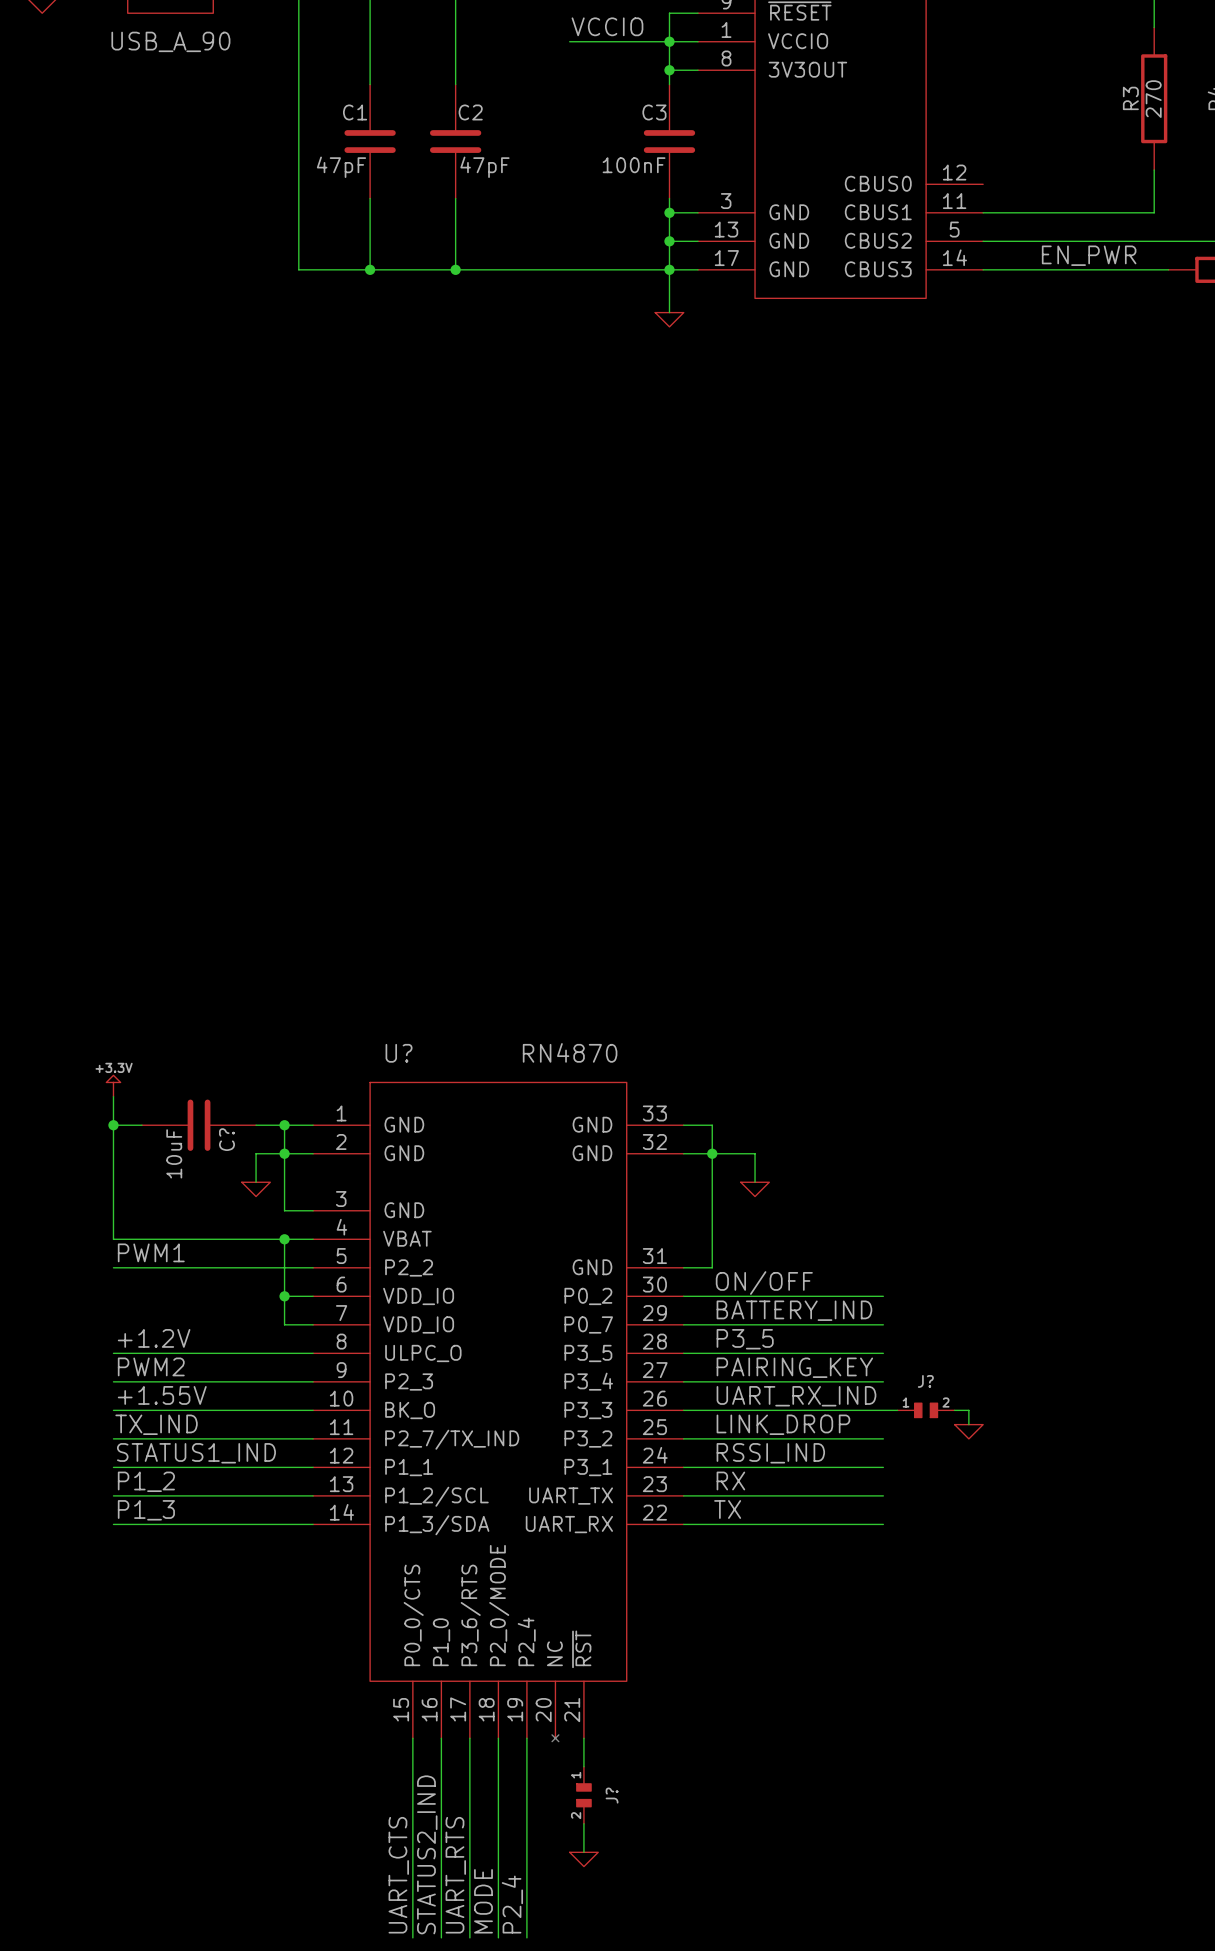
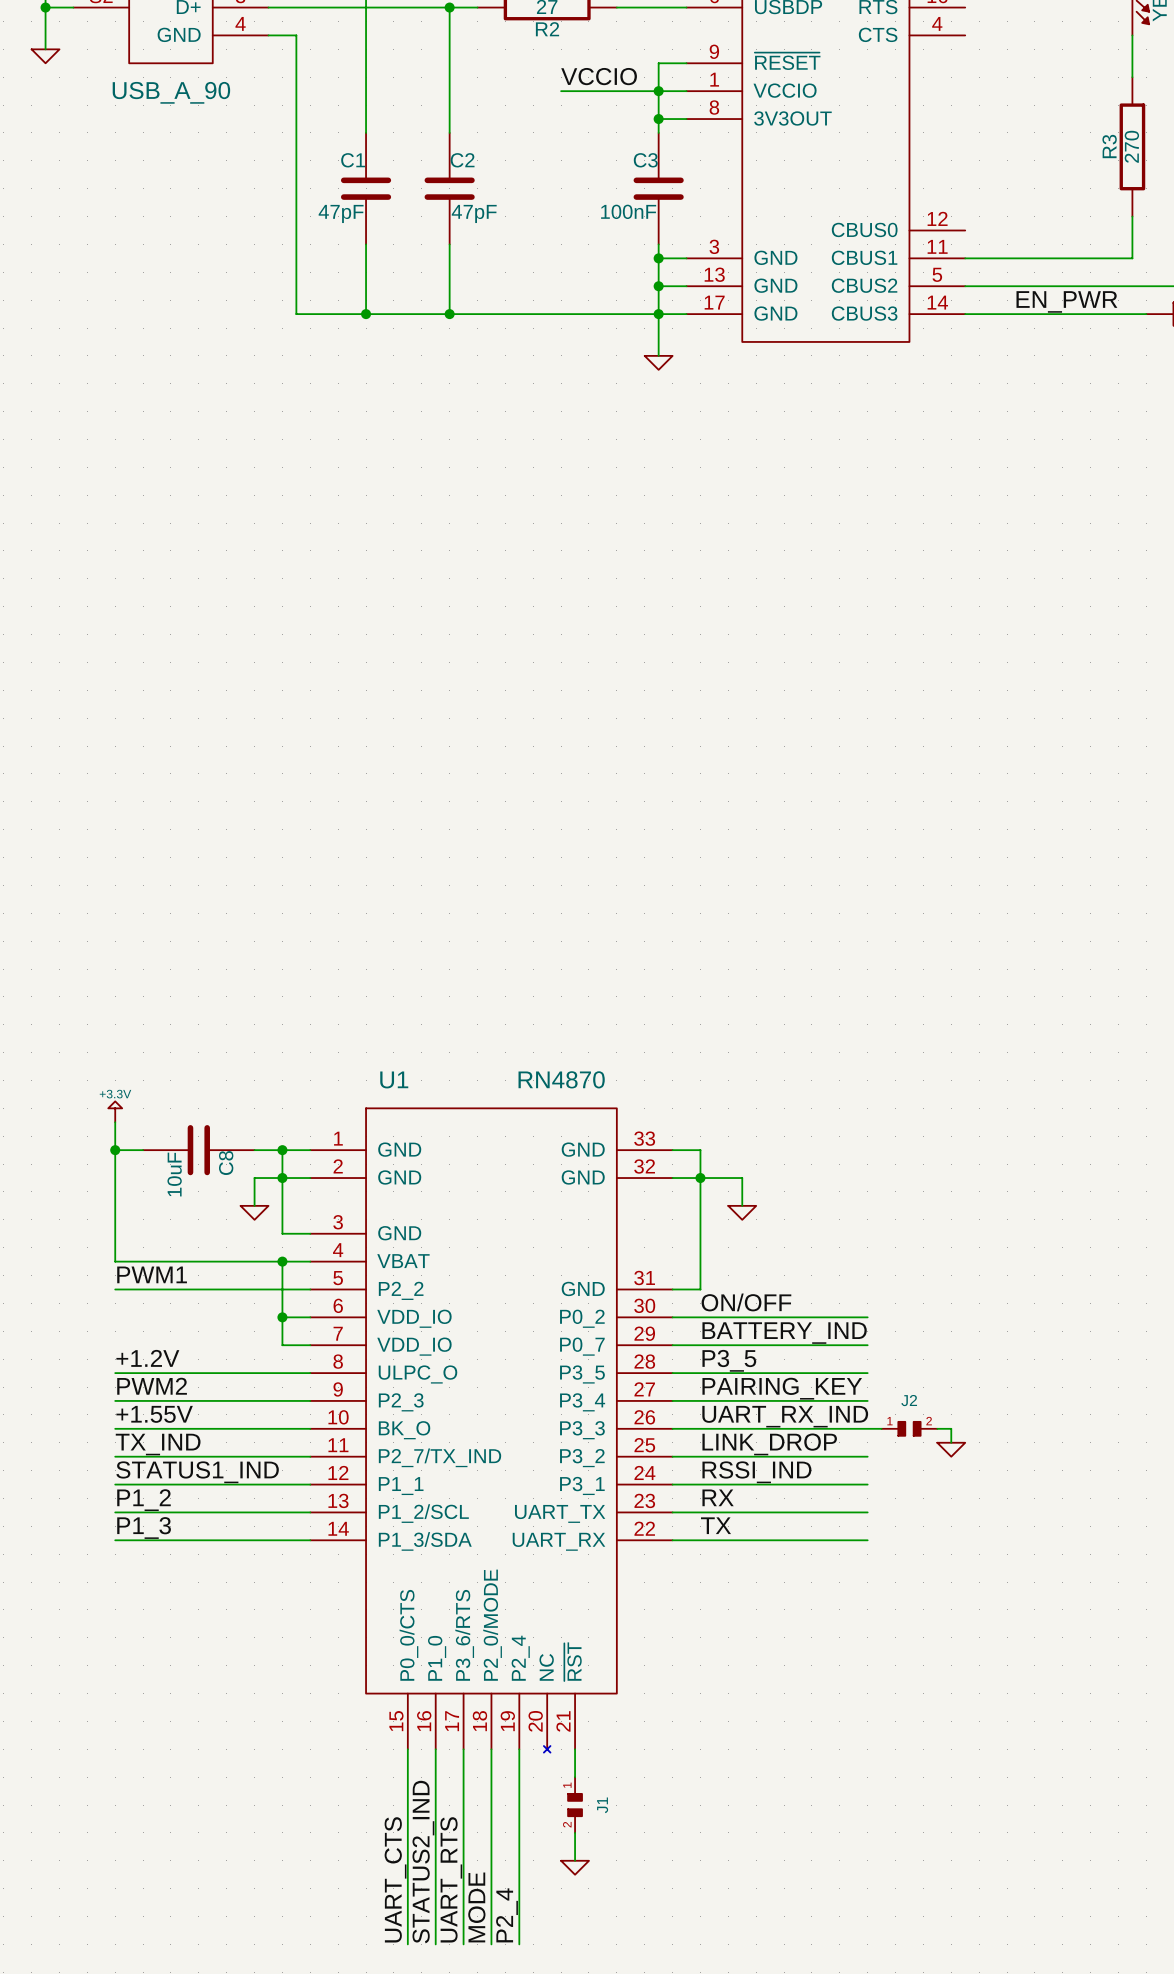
U? name: U? (399, 1053) -> U1 (394, 1079)
C? name: C? (227, 1139) -> C8 (226, 1163)
J? name: J? (925, 1381) -> J2 (909, 1400)
J? name: J? (612, 1795) -> J1 (602, 1805)

